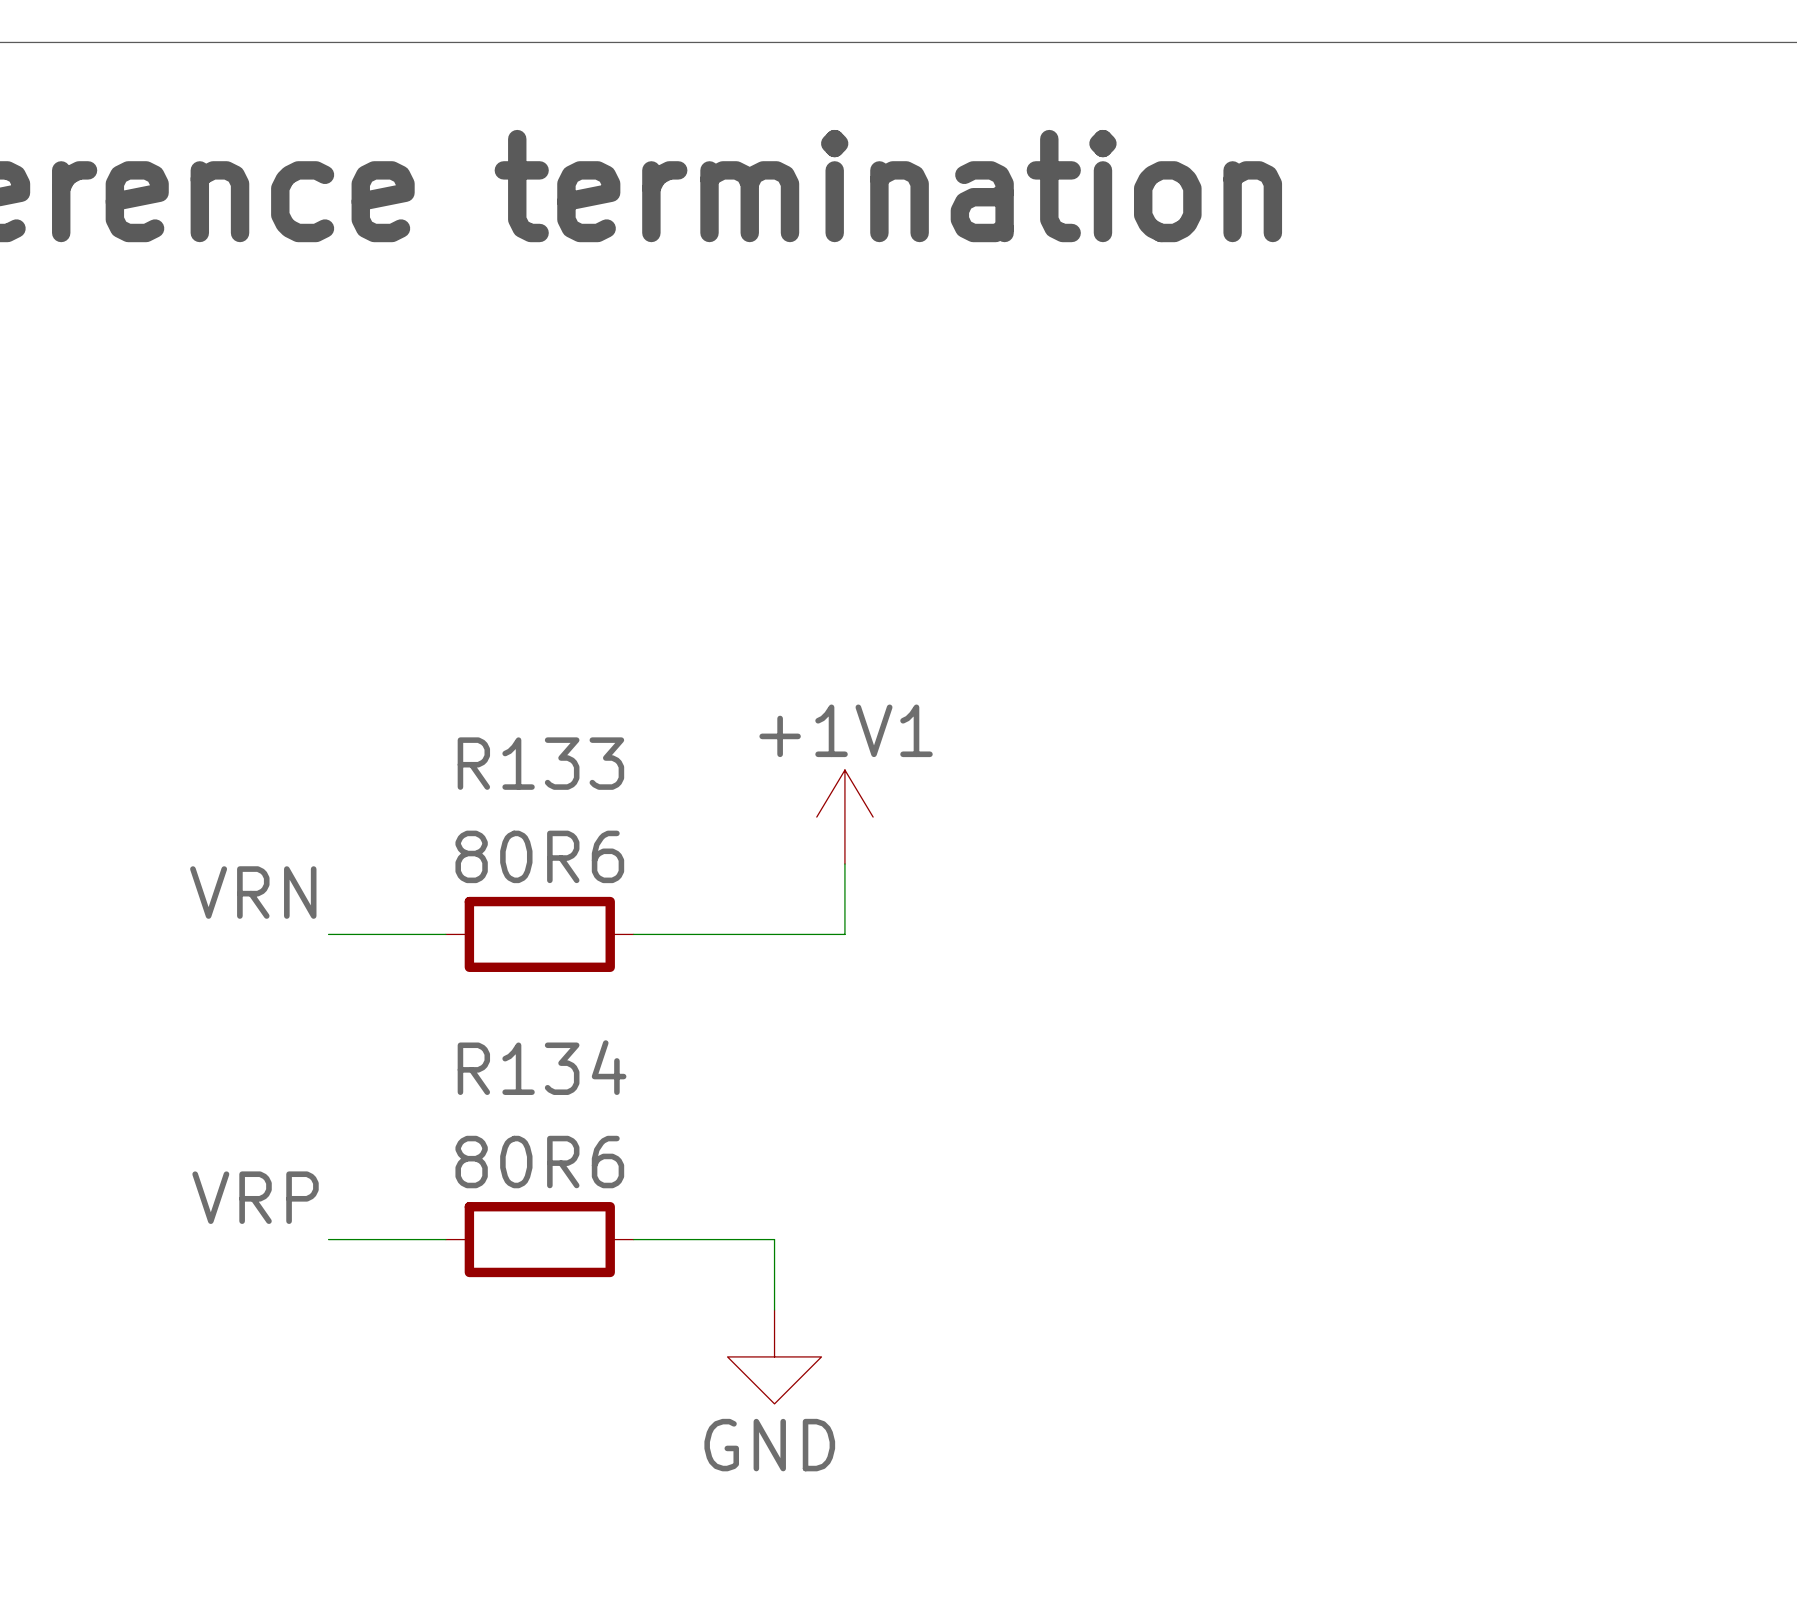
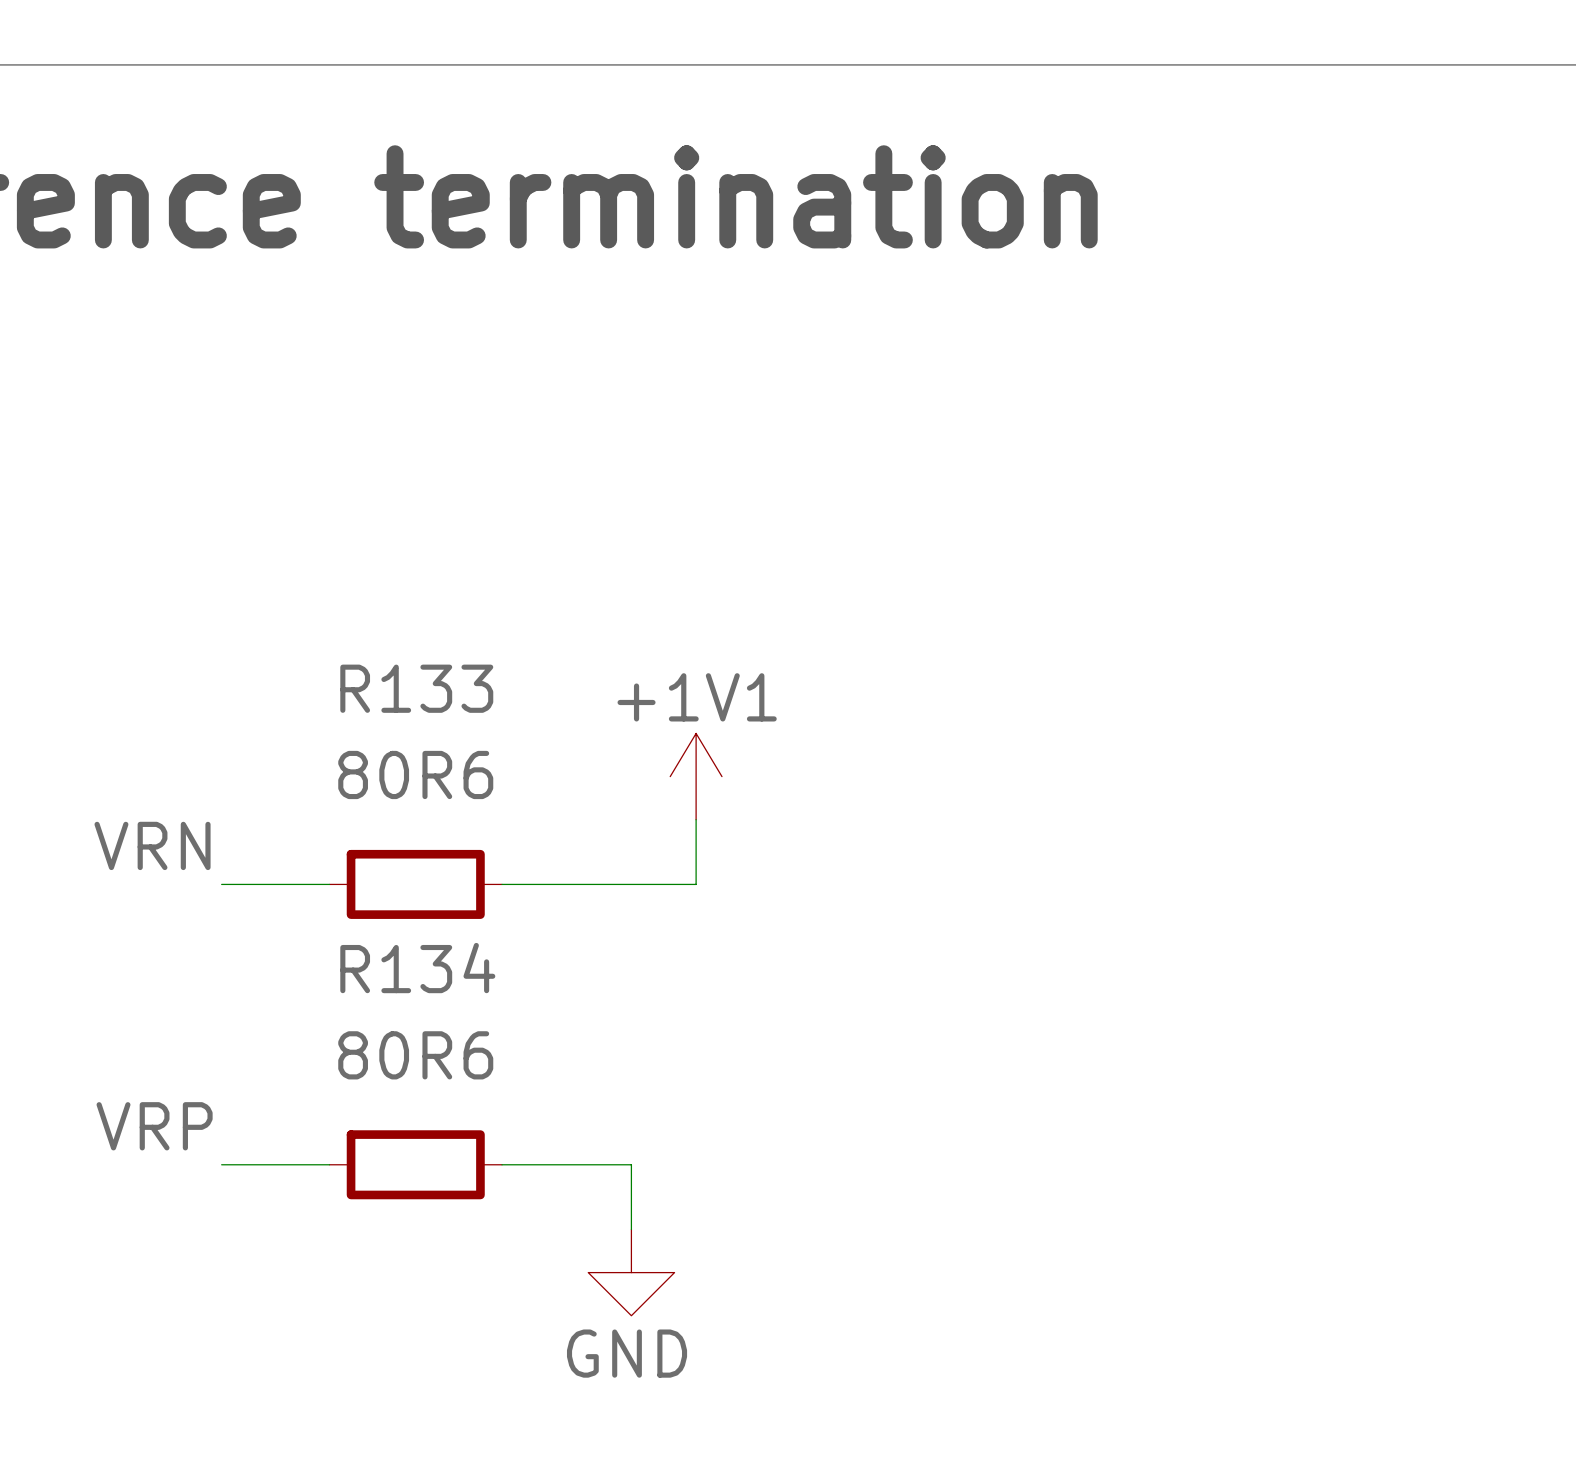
R133 name position: R133 (540, 763) -> R133 (416, 688)
R133 text position: 80R6 (539, 856) -> 80R6 (415, 774)
R134 name position: R134 (542, 1067) -> R134 (417, 968)
R134 text position: 80R6 (539, 1162) -> 80R6 (415, 1055)

